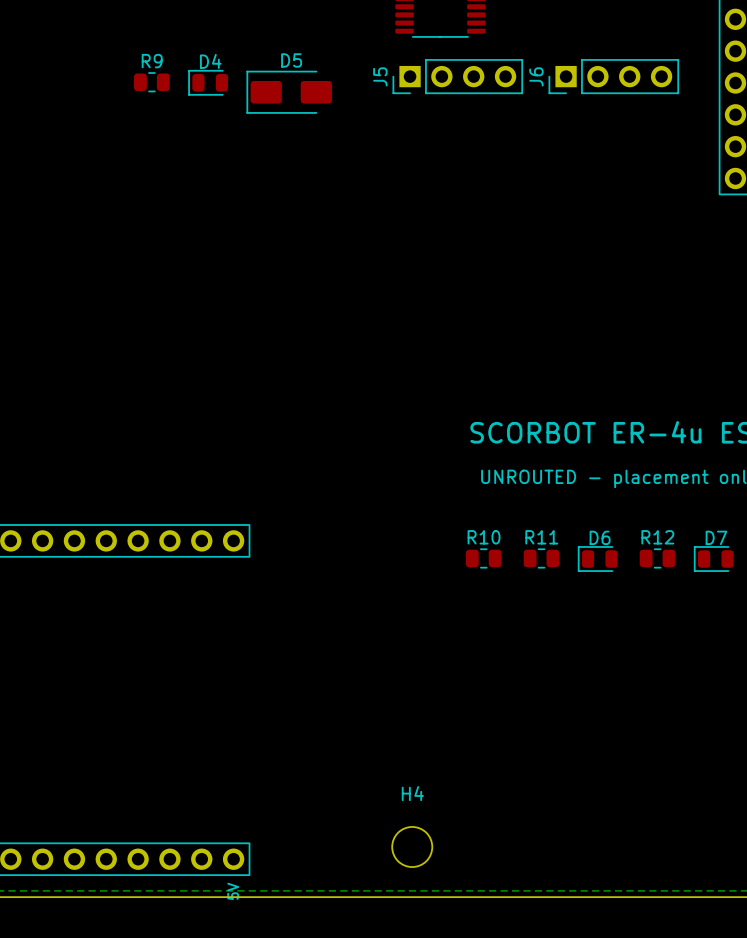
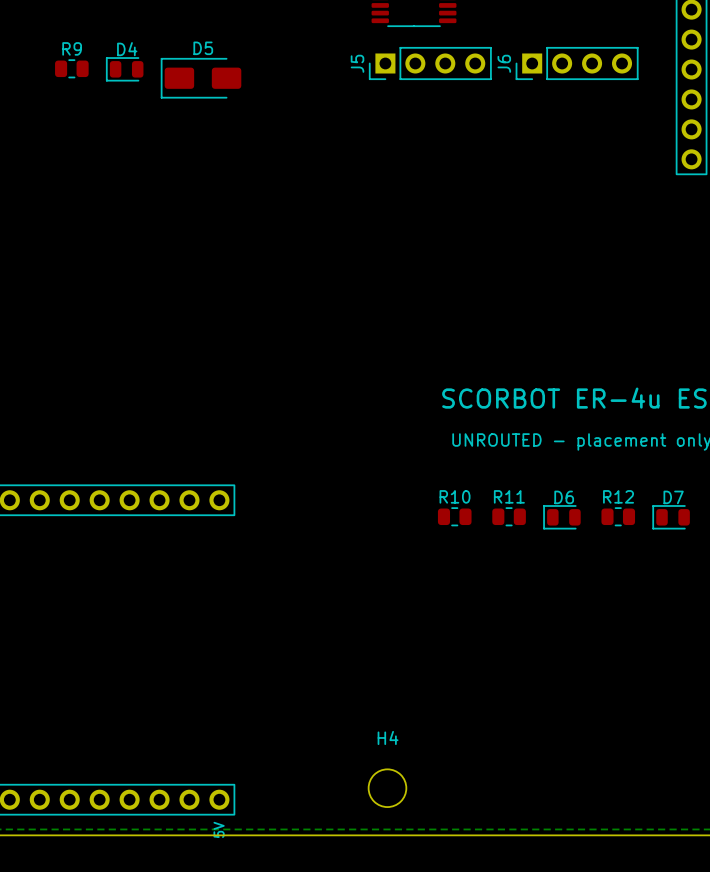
R9 position: (151, 82) -> (71, 68)
D4 position: (208, 82) -> (124, 69)
D5 position: (289, 92) -> (201, 78)

